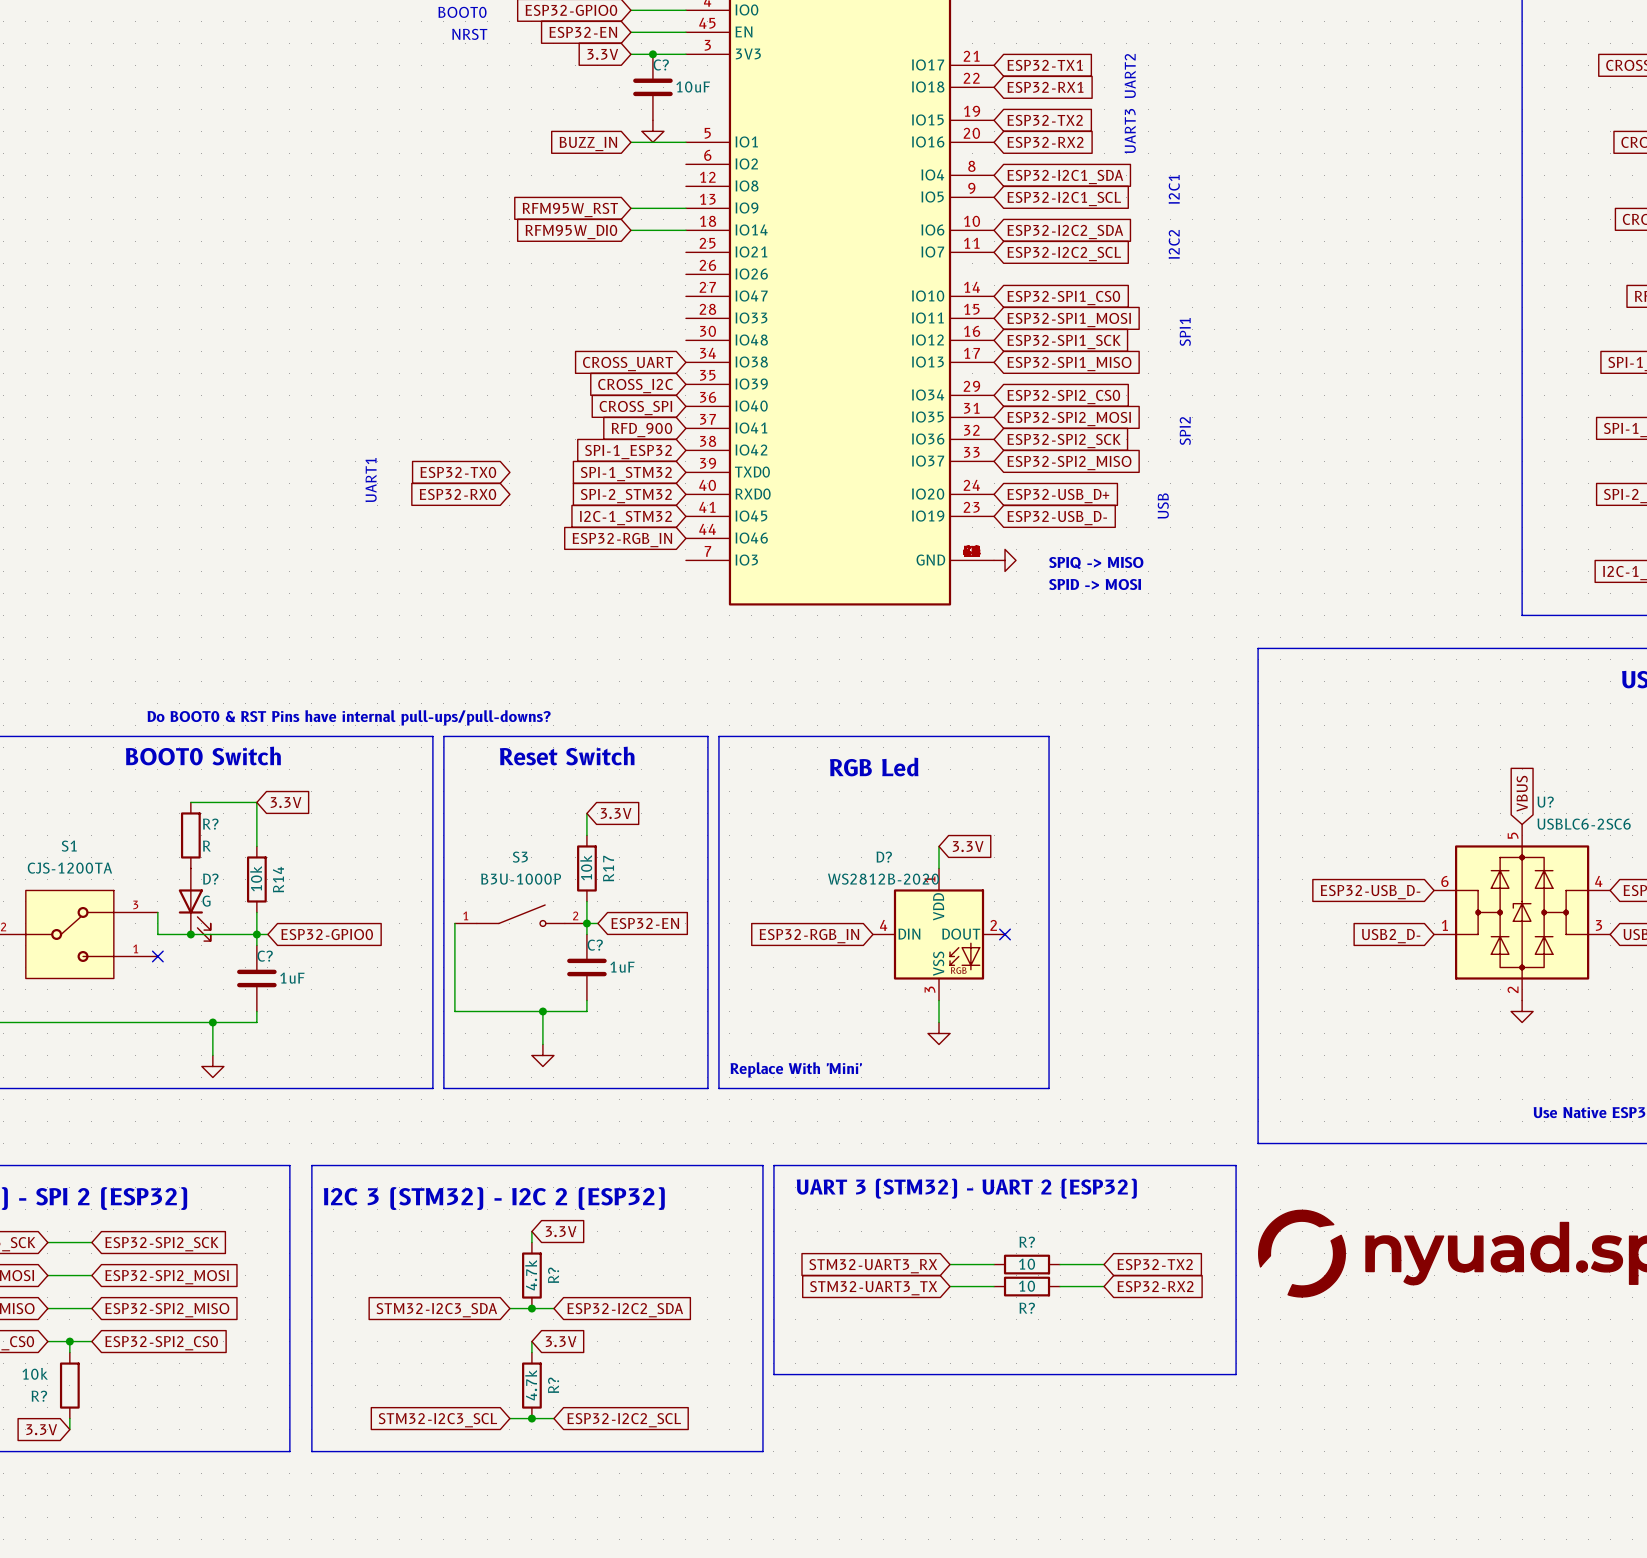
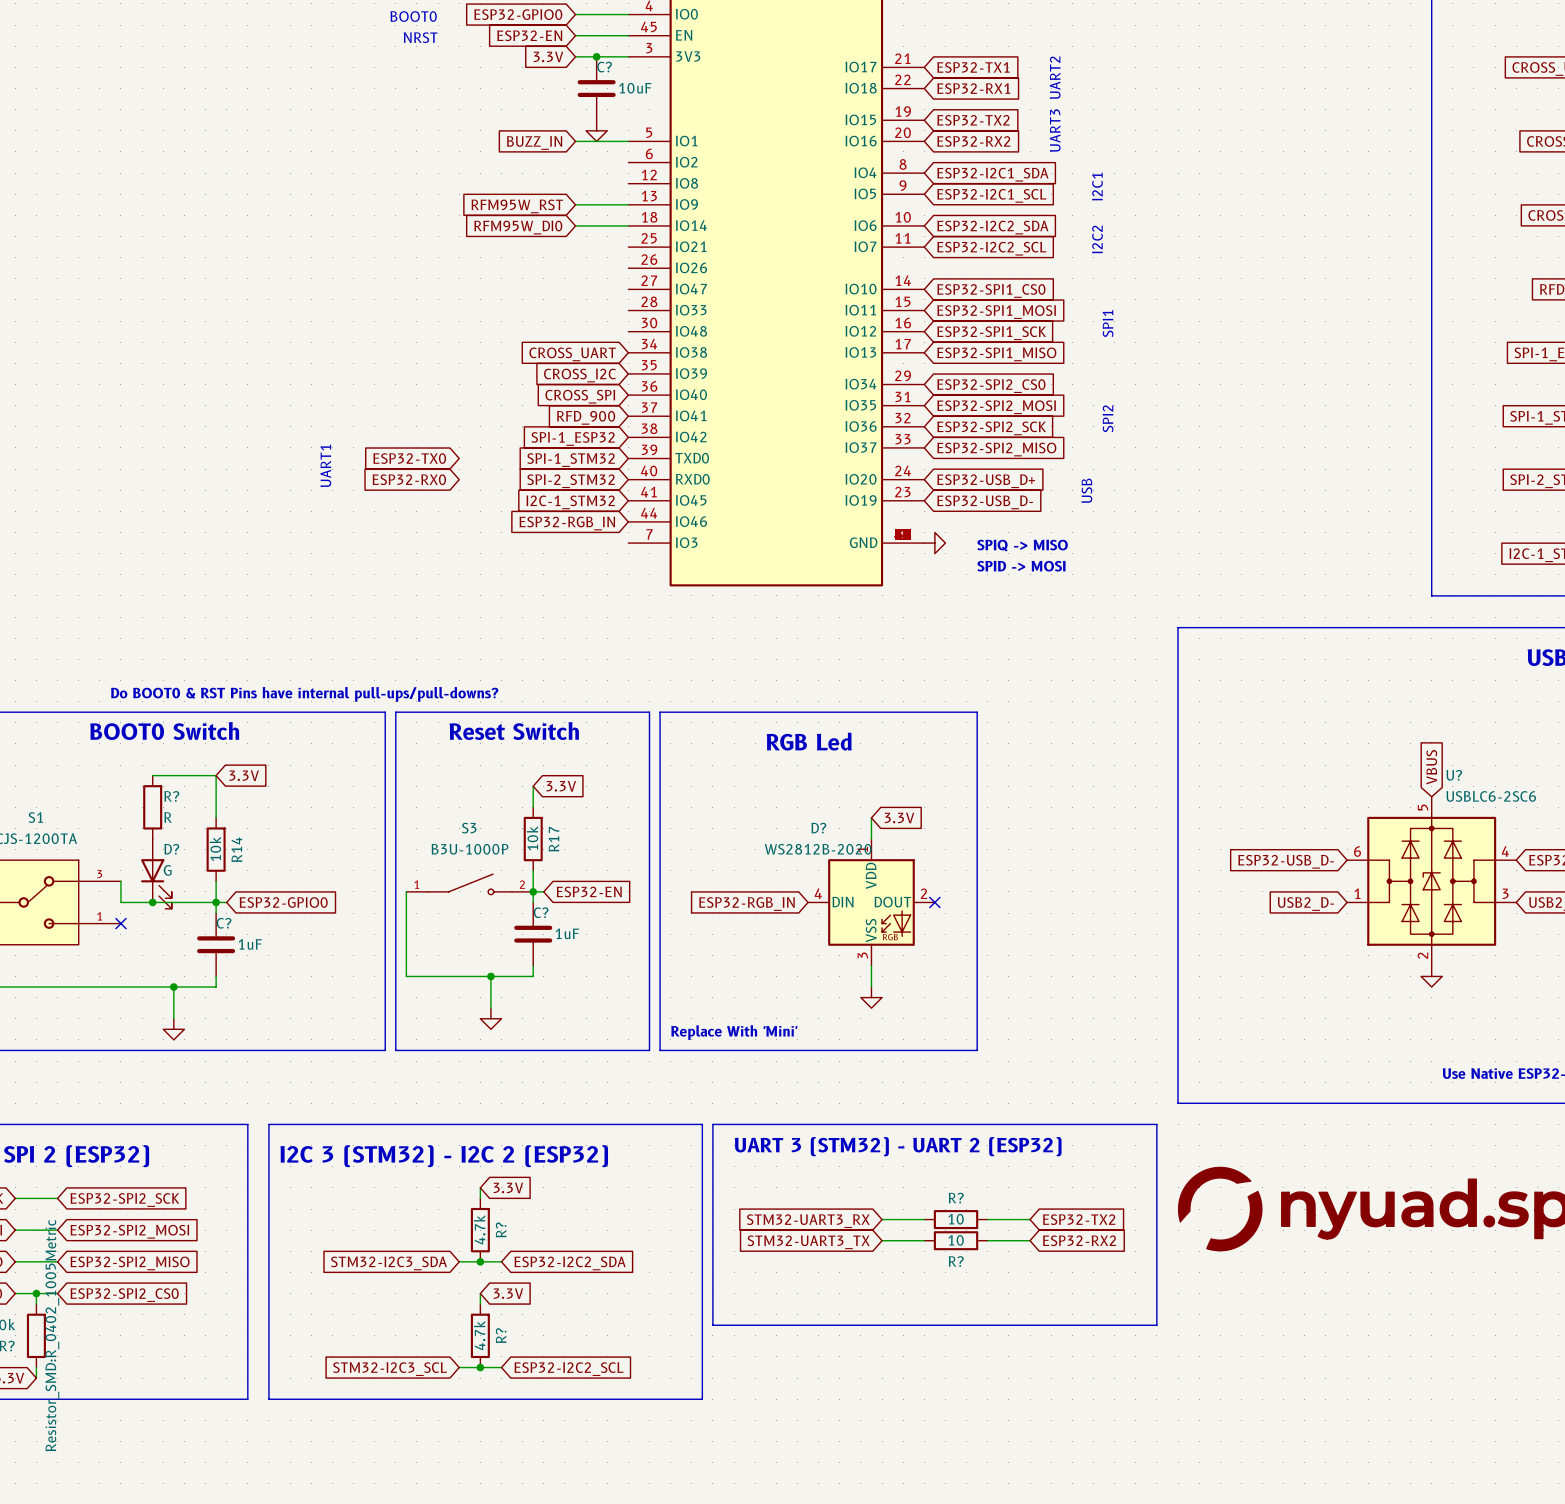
R? text: none -> Resistor_SMD:R_0402_1005Metric (52, 1335)

